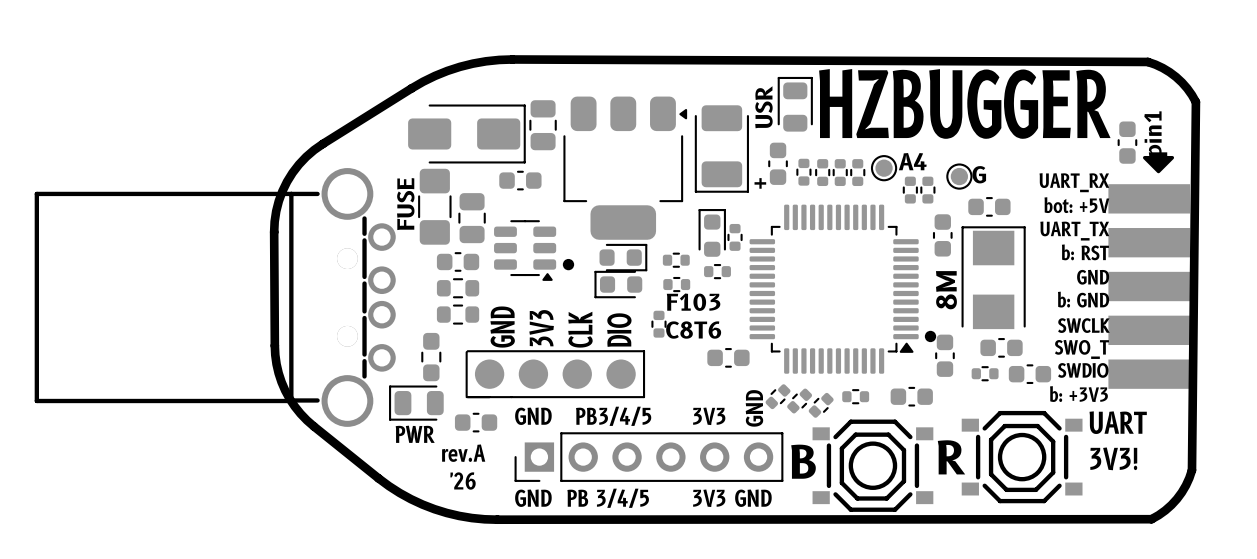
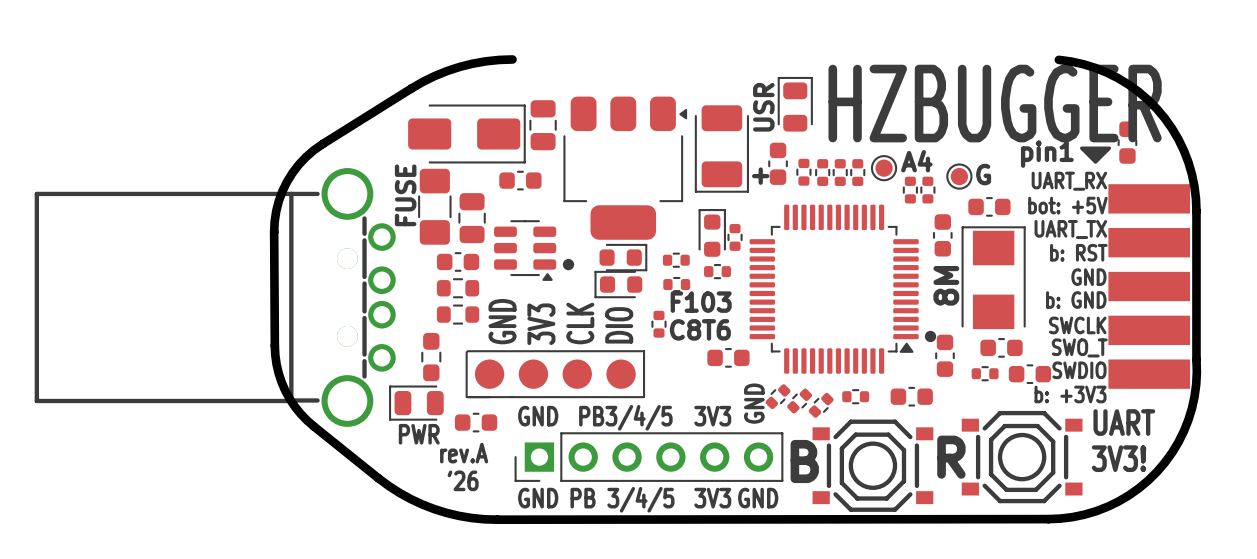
board edge: (512, 59) (1147, 61) (1169, 72) (1187, 88) (1195, 102) (1191, 470) (1185, 485) (1176, 499) (1165, 510) (1151, 519) (497, 519) -> (1058, 59) (1083, 64) (1106, 72) (1128, 84) (1148, 100) (1164, 118) (1178, 139) (1188, 162) (1194, 186) (1196, 211) (1196, 372) (1194, 396) (1188, 419) (1178, 442) (1165, 462) (1139, 488) (1118, 501) (1096, 511) (1060, 518) (497, 519)
text rotation: 0° (1155, 133) -> 90° clockwise (1047, 154)
text position: pin1 (1155, 133) -> pin1 (1047, 154)
drawing position: (1158, 164) -> (1095, 155)

